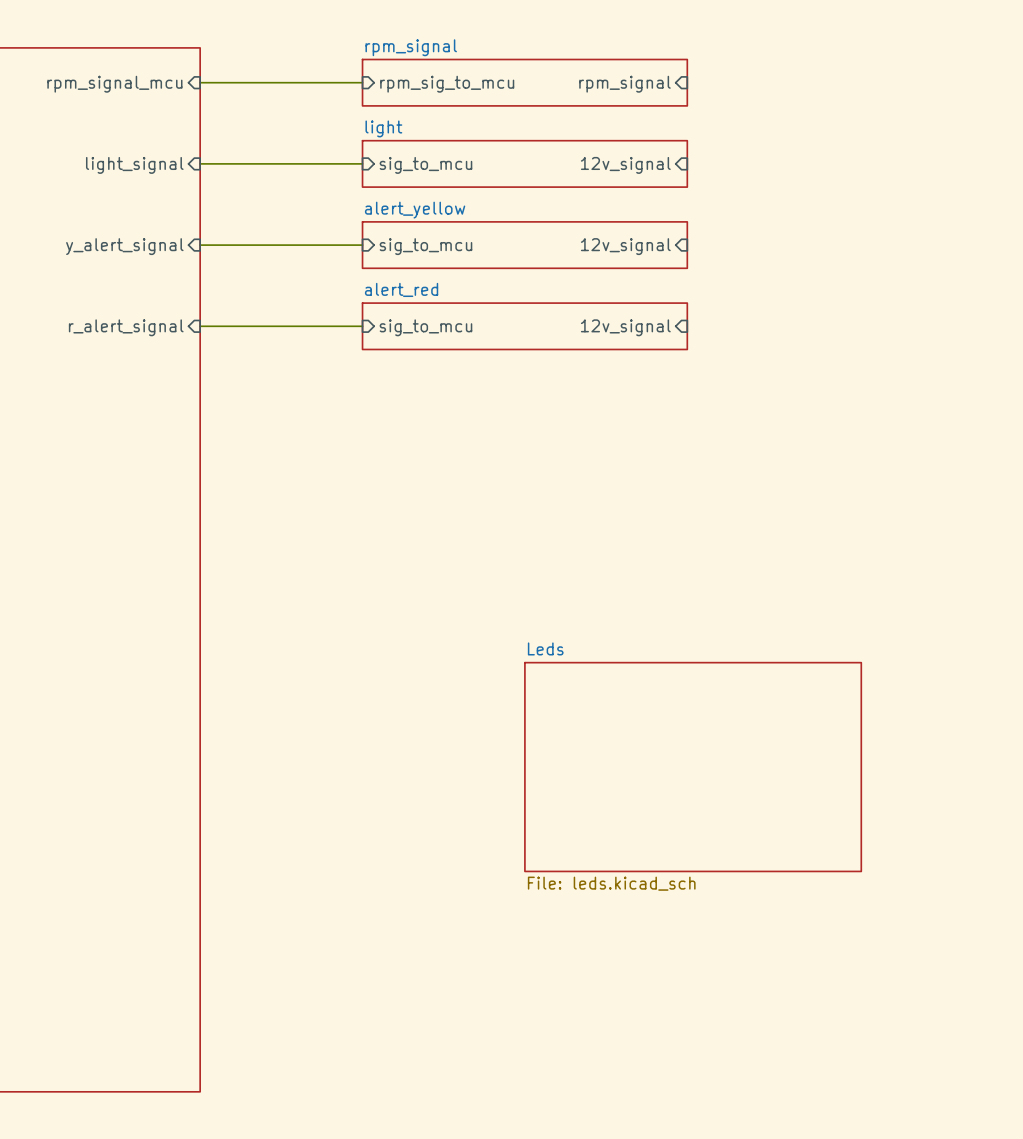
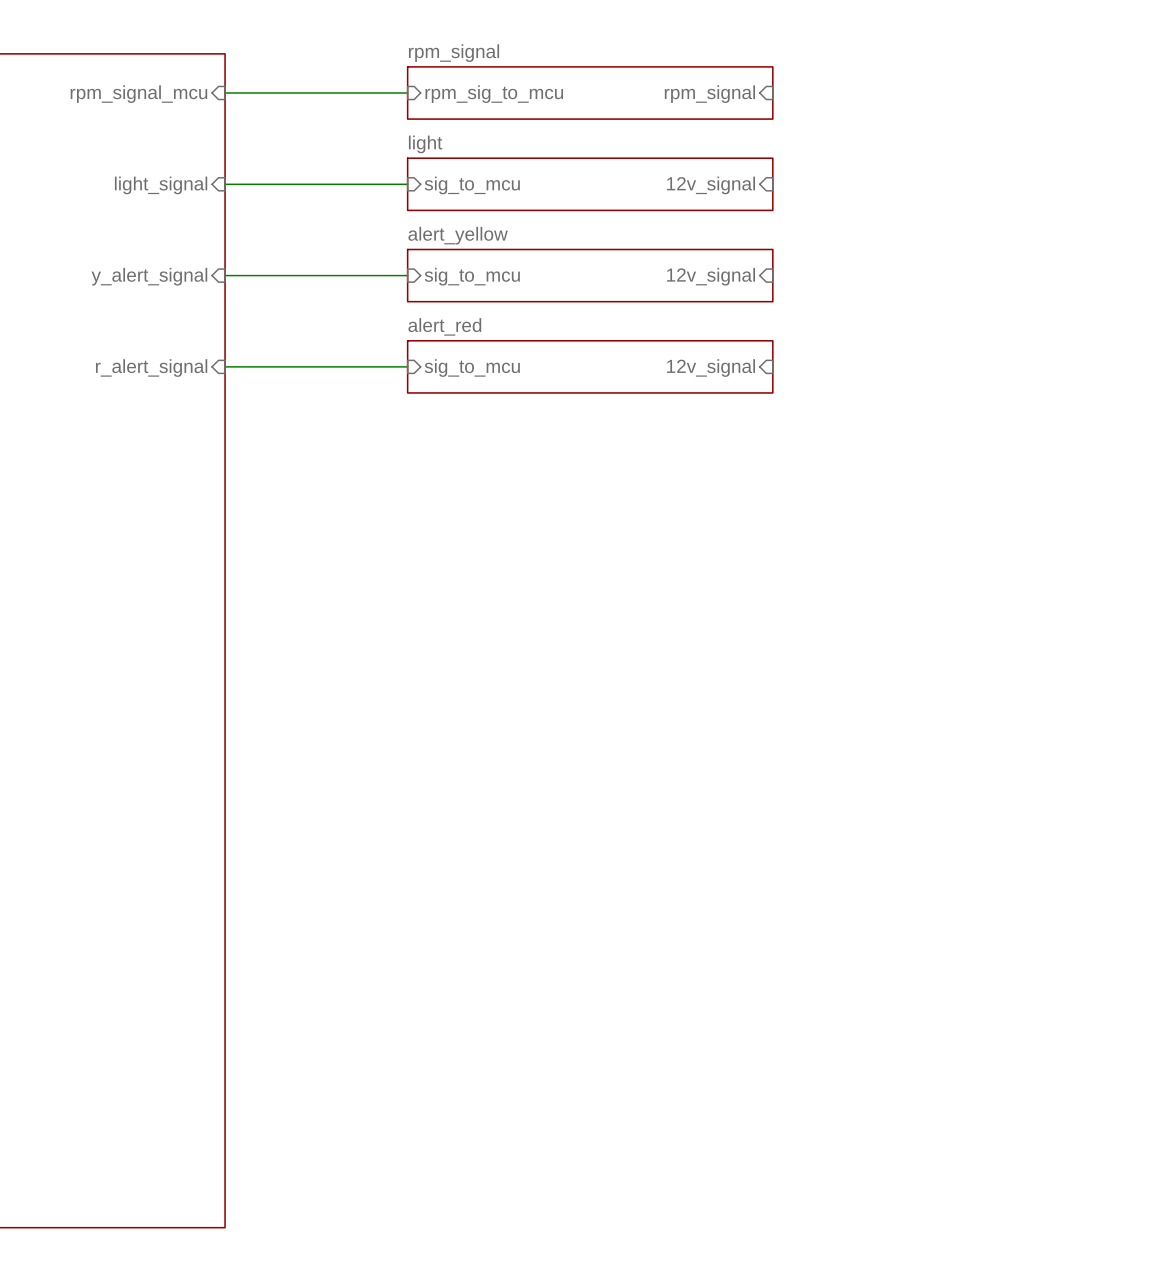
sheet Leds: File: leds.kicad_sch (693, 767) -> none

